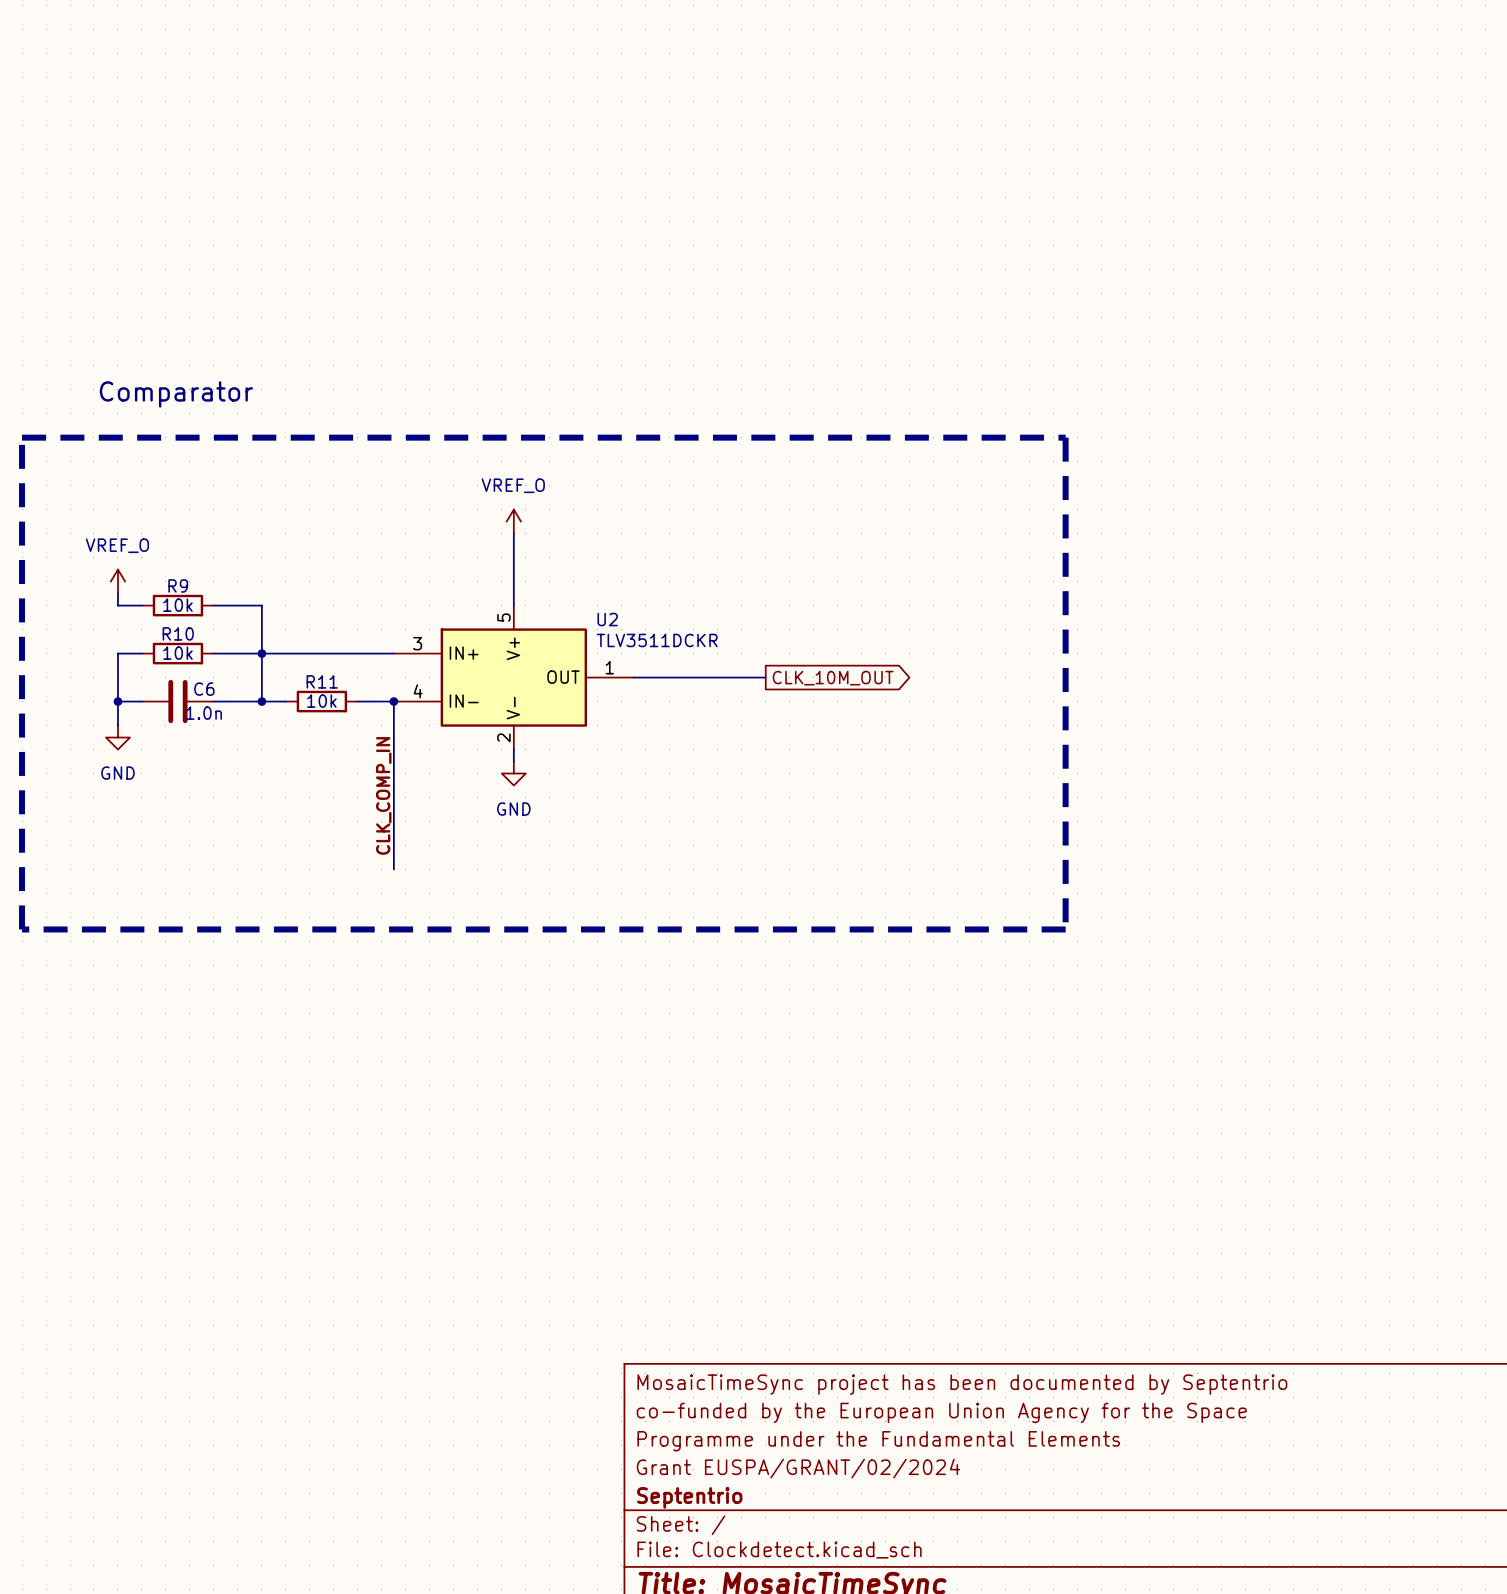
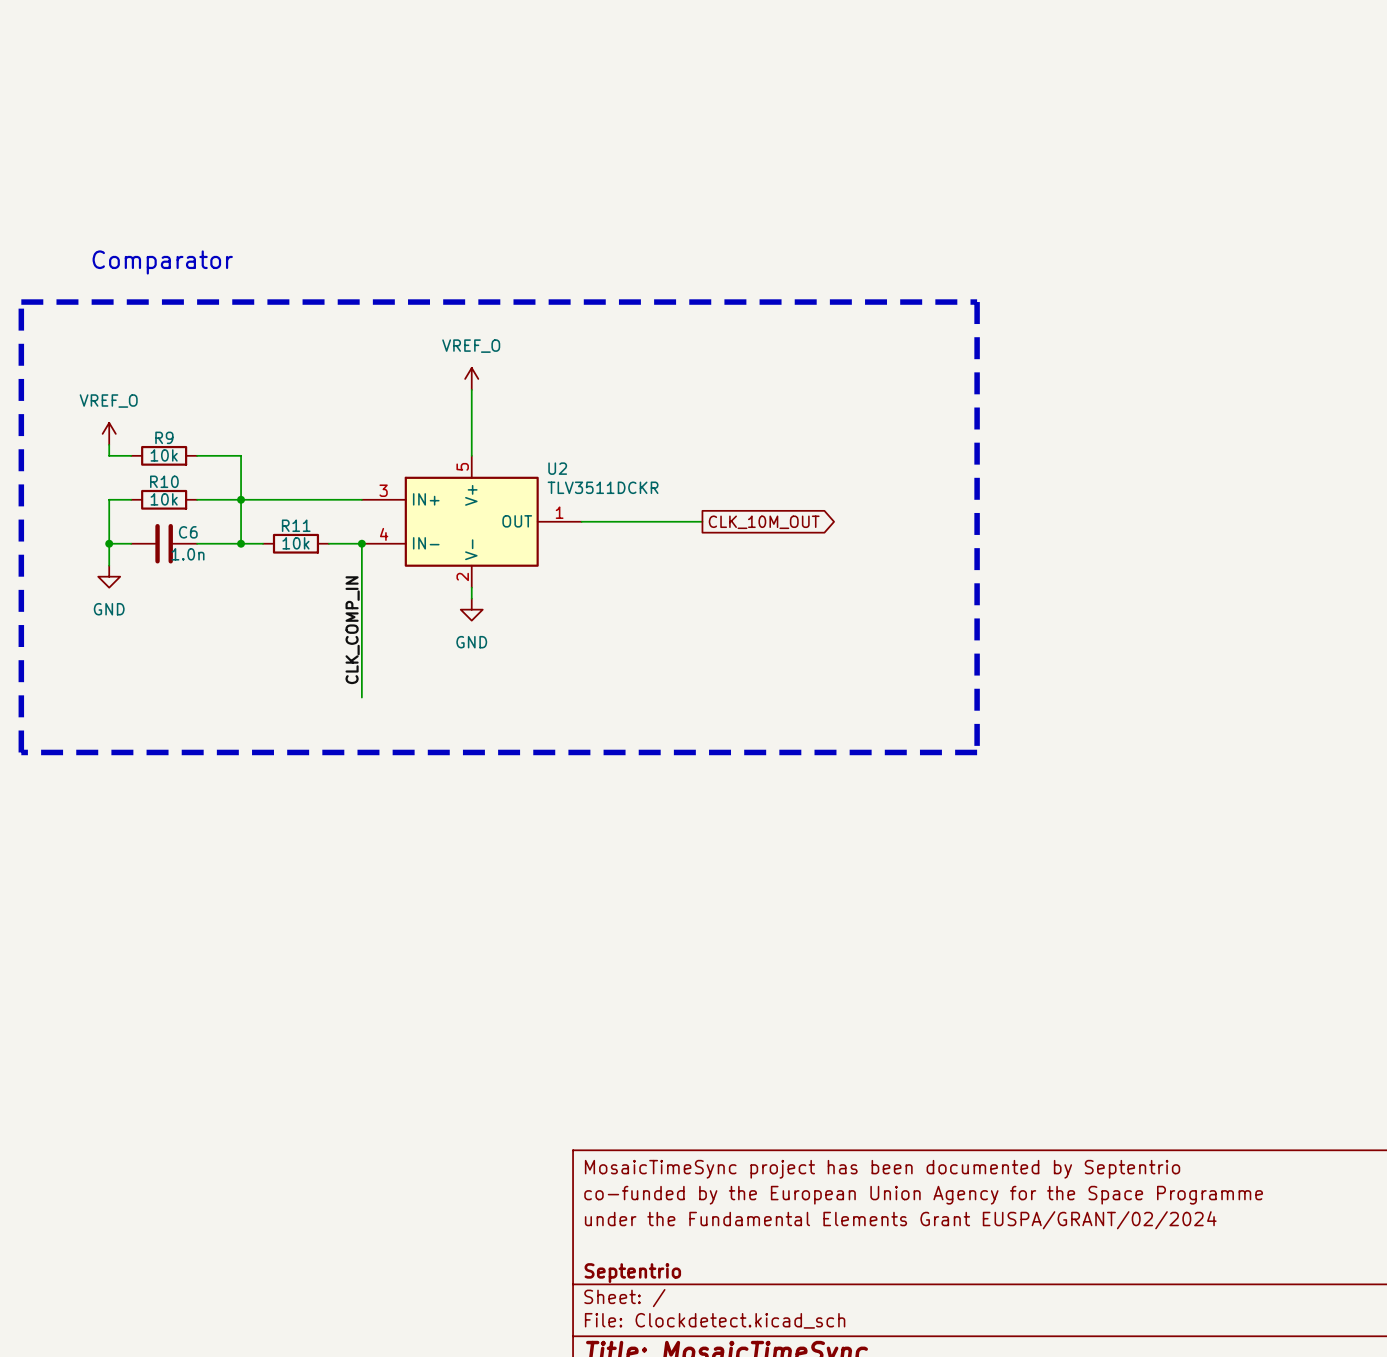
title block: co-funded by the European Union Agency for the Space (941, 1412) -> co-funded by the European Union Agency for the Space Programme (923, 1195)
title block: Programme under the Fundamental Elements (878, 1441) -> under the Fundamental Elements Grant EUSPA/GRANT/02/2024 (900, 1220)
title block: Grant EUSPA/GRANT/02/2024 (798, 1468) -> none

